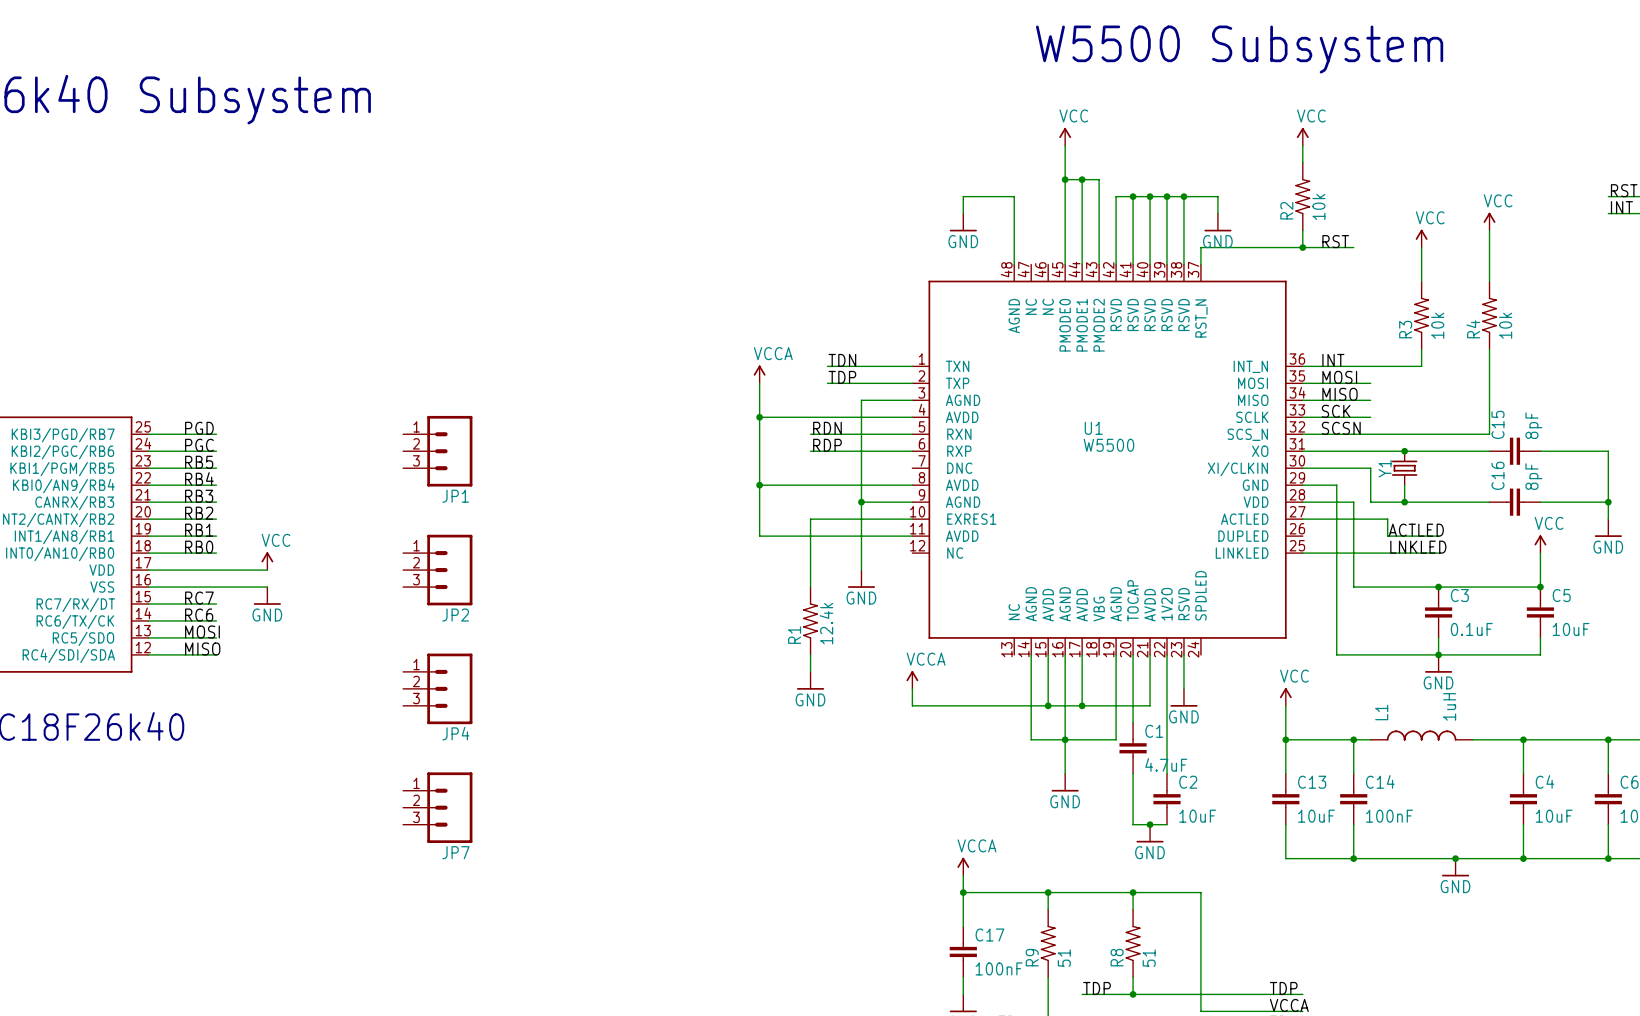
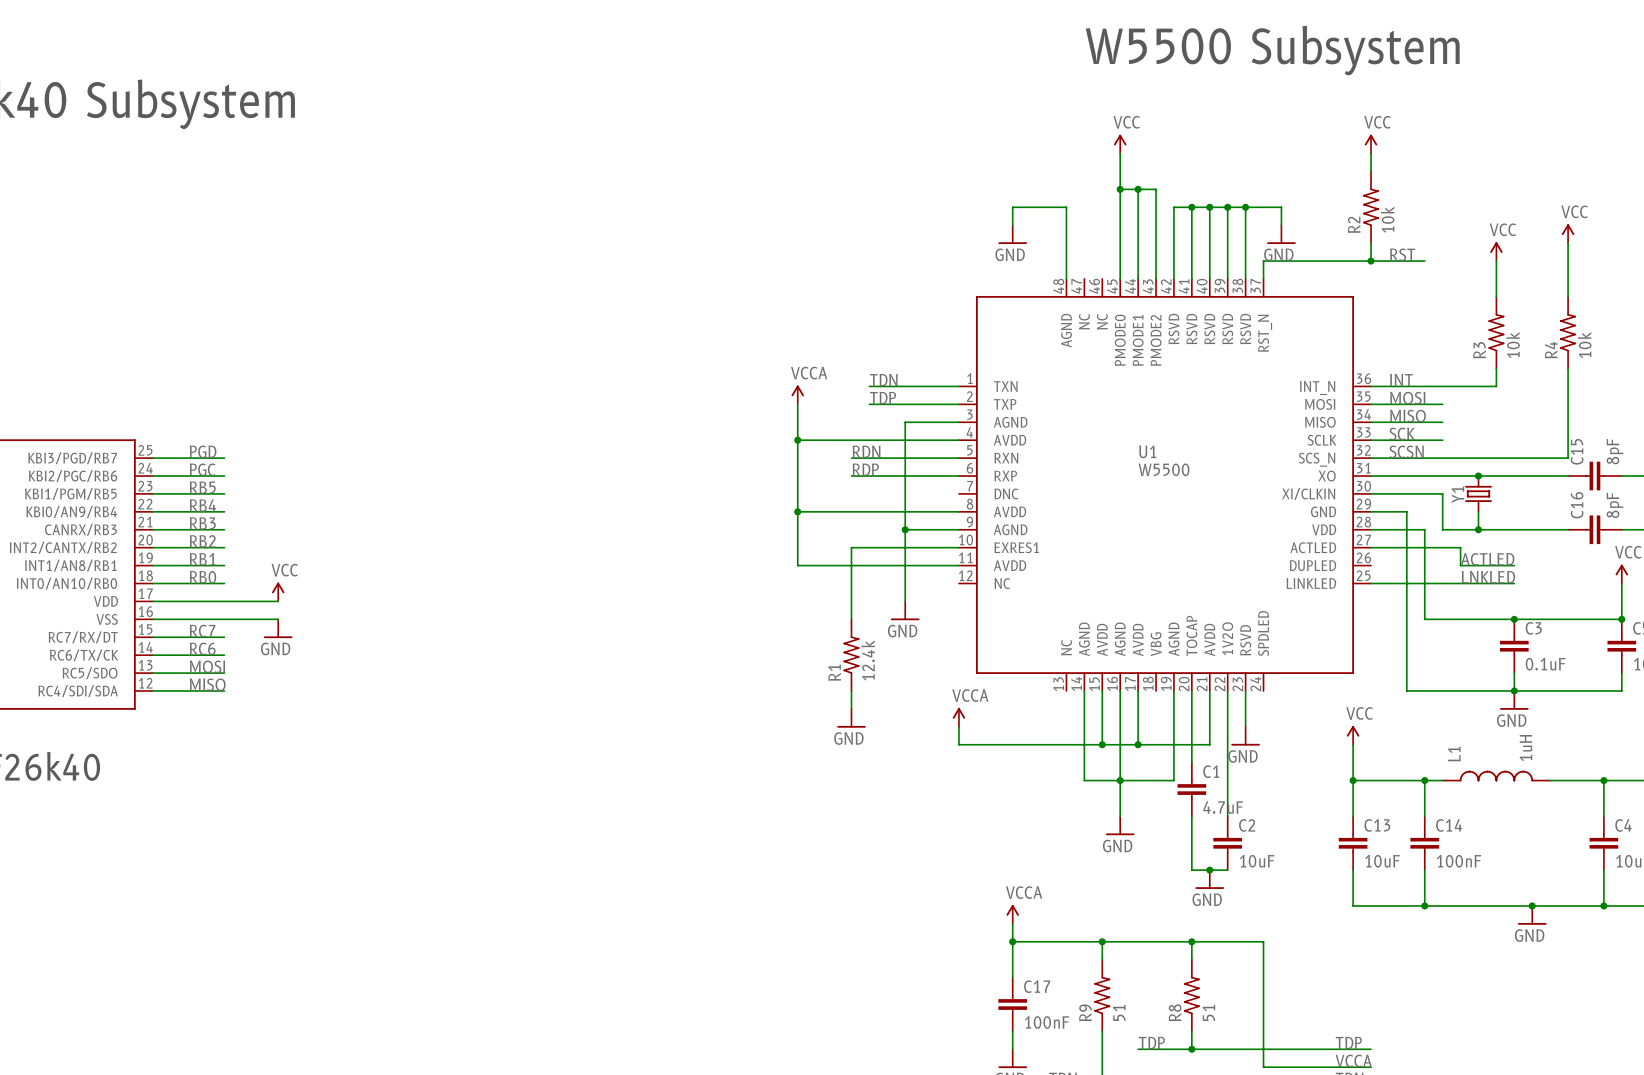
JP1: (437, 451) -> none
JP2: (437, 570) -> none
JP4: (437, 688) -> none
JP7: (437, 807) -> none

